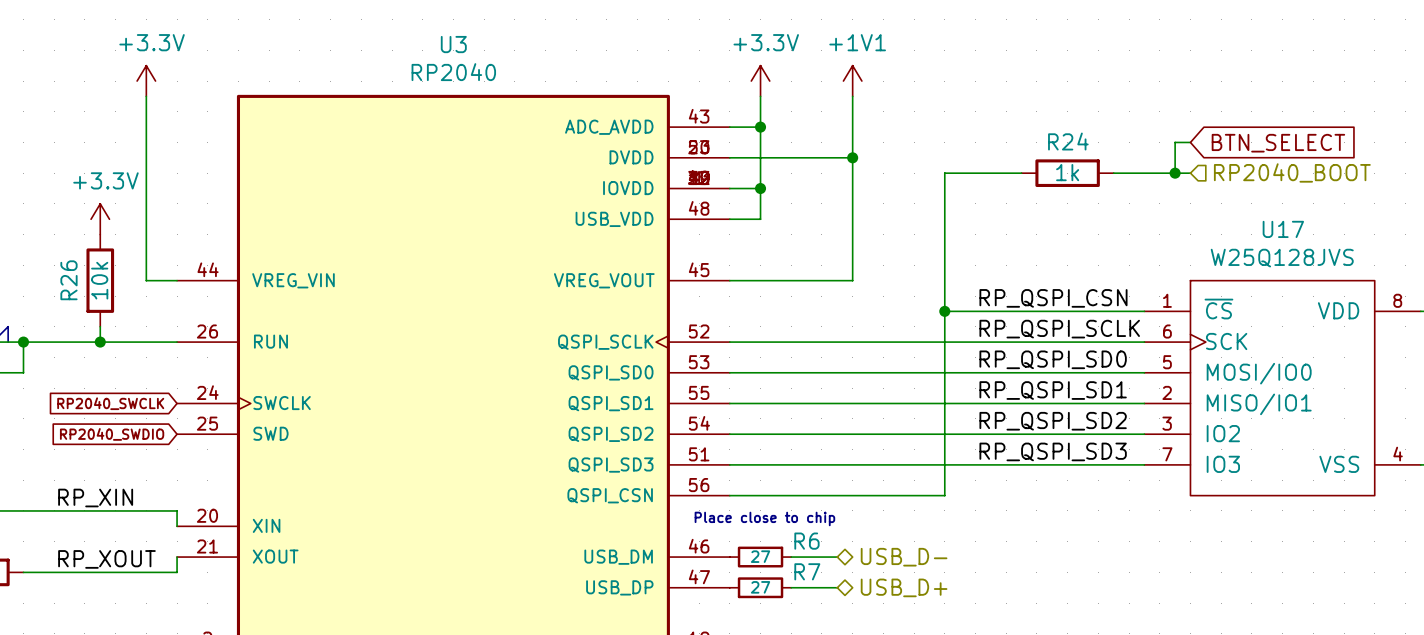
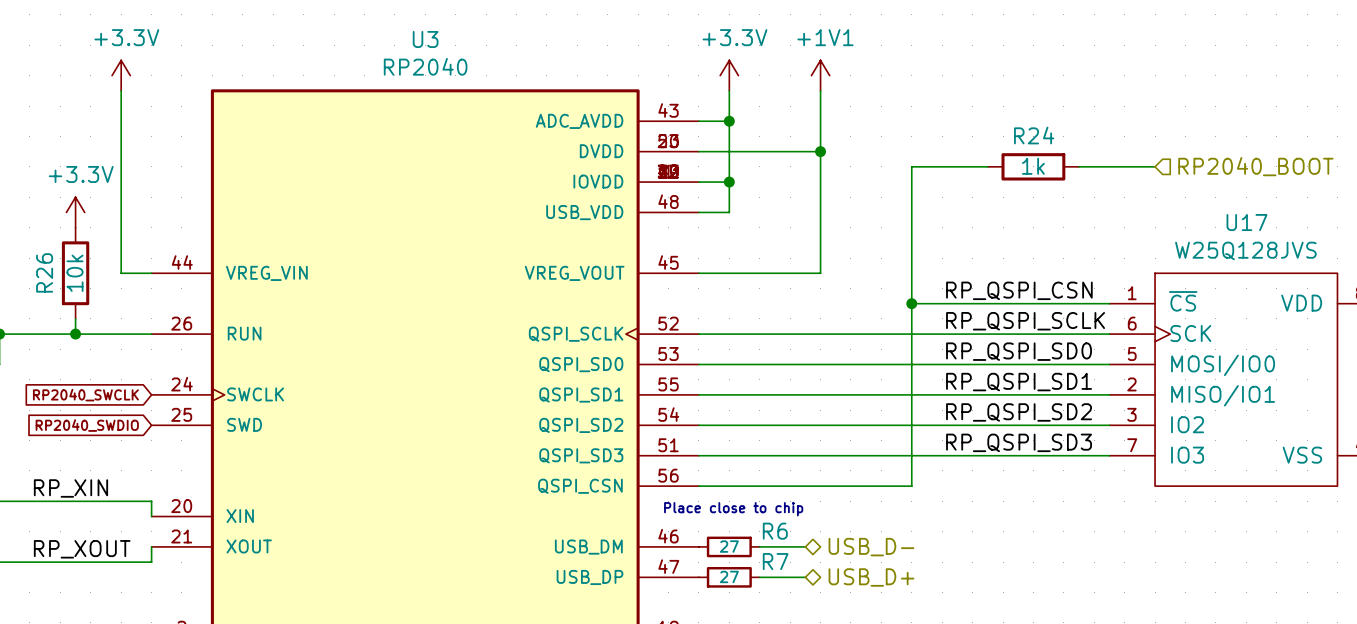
wire: (1190, 142) (1175, 142) (1175, 173) -> none
global label: BTN_SELECT (1278, 143) -> none
junction: (1175, 173) -> none

